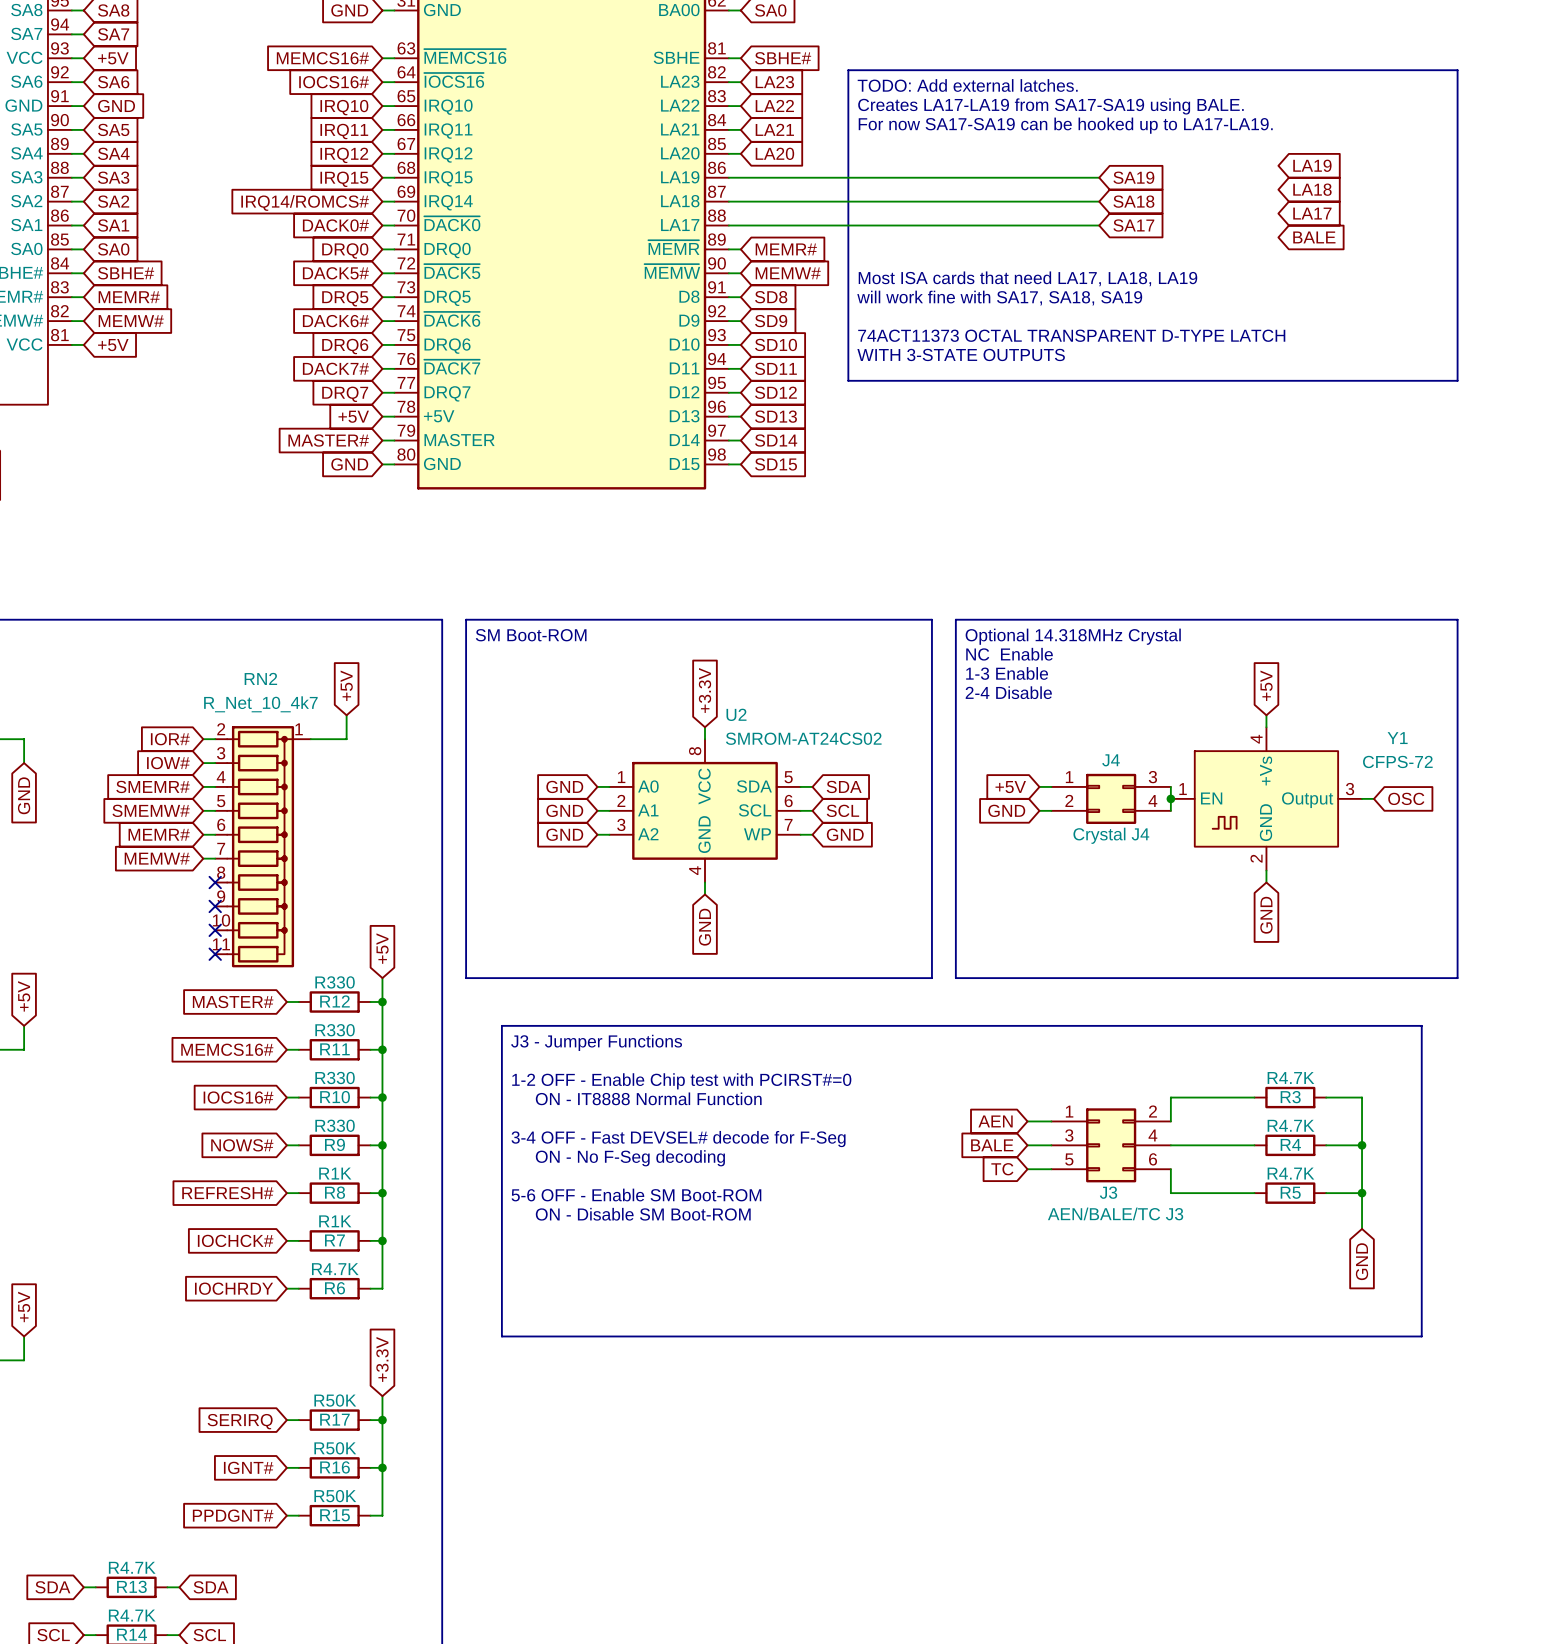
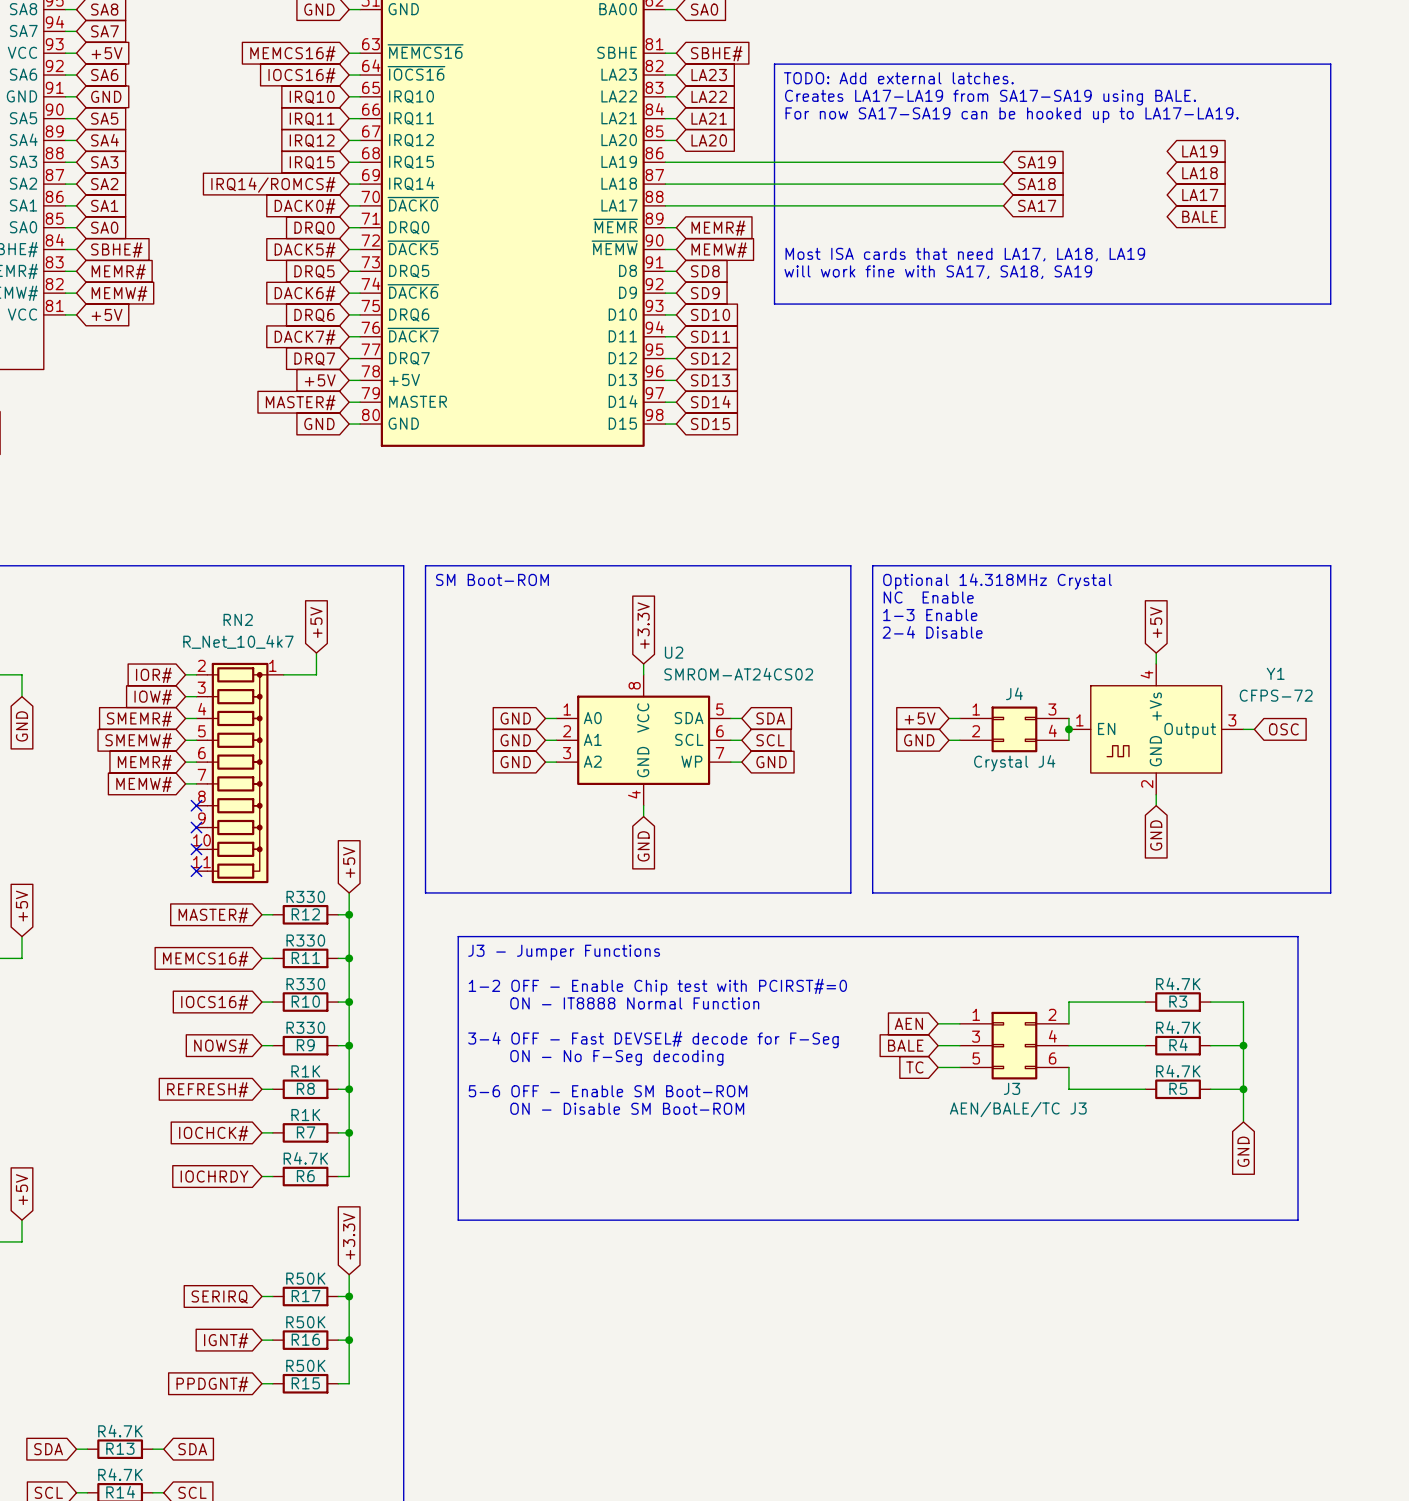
line: (848, 333) (848, 380) (1457, 380) (1457, 333) -> (774, 304) (1330, 304)
text: 74ACT11373 OCTAL TRANSPARENT D-TYPE LATCH (1071, 335) -> none
text: WITH 3-STATE OUTPUTS (961, 354) -> none

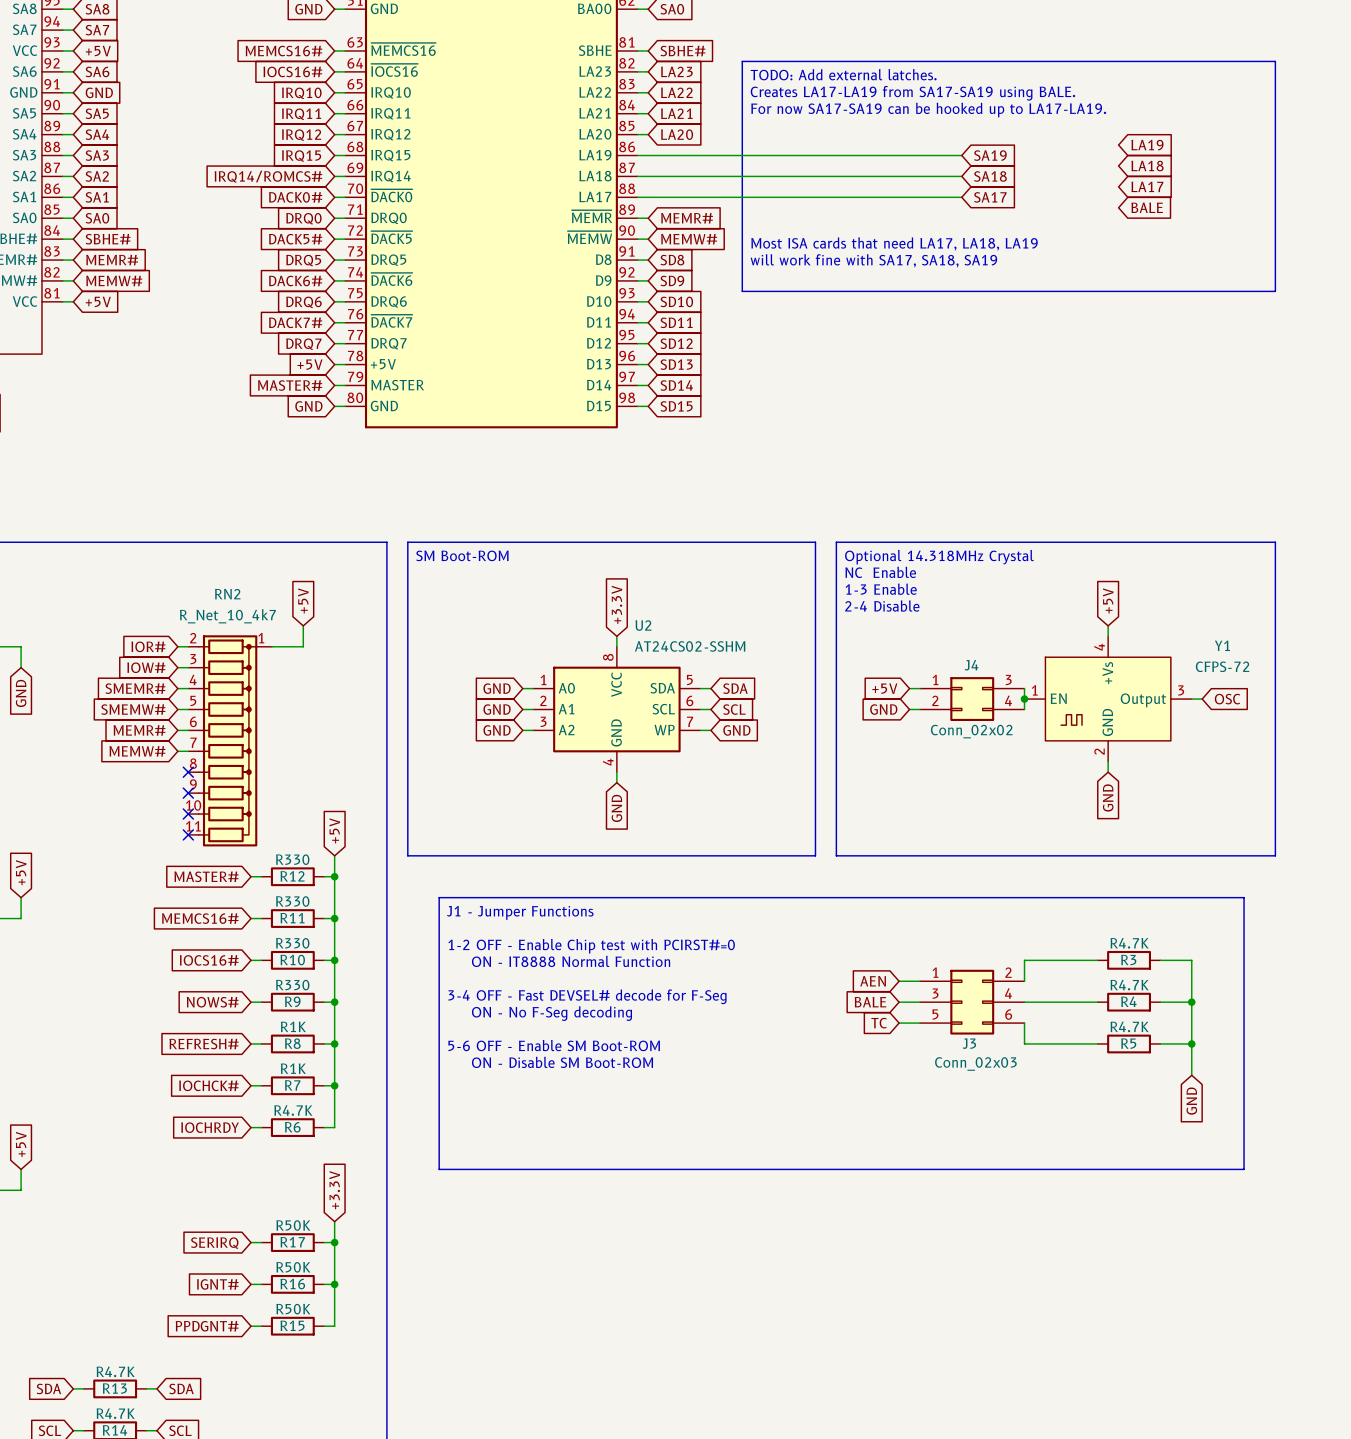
U2 value: SMROM-AT24CS02 (738, 674) -> AT24CS02-SSHM (690, 646)
J4 value: Crystal J4 (1014, 763) -> Conn_02x02 (971, 731)
text: J3 - Jumper Functions (564, 952) -> J1 - Jumper Functions (520, 912)
J3 value: AEN/BALE/TC J3 (1018, 1109) -> Conn_02x03 (975, 1063)

